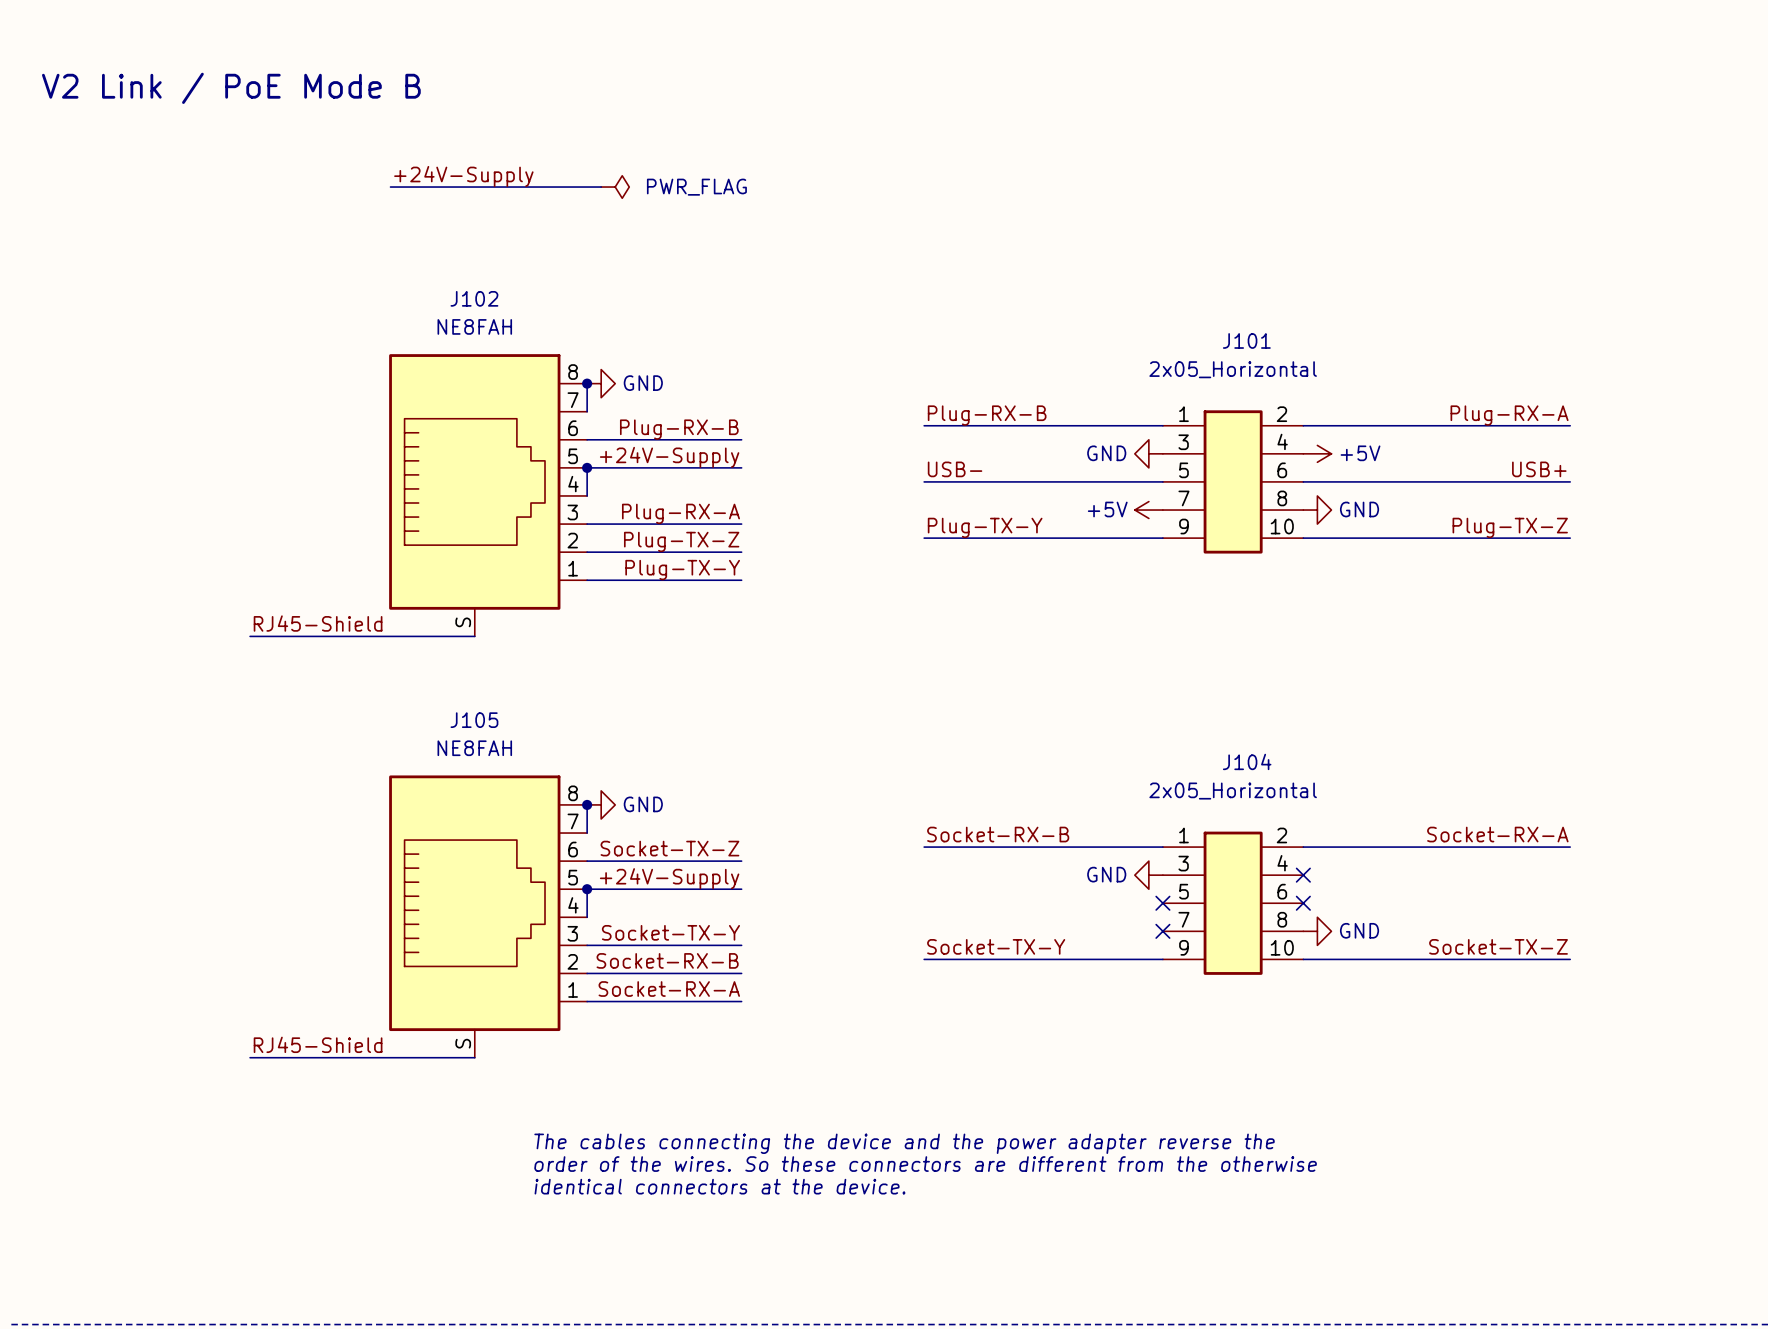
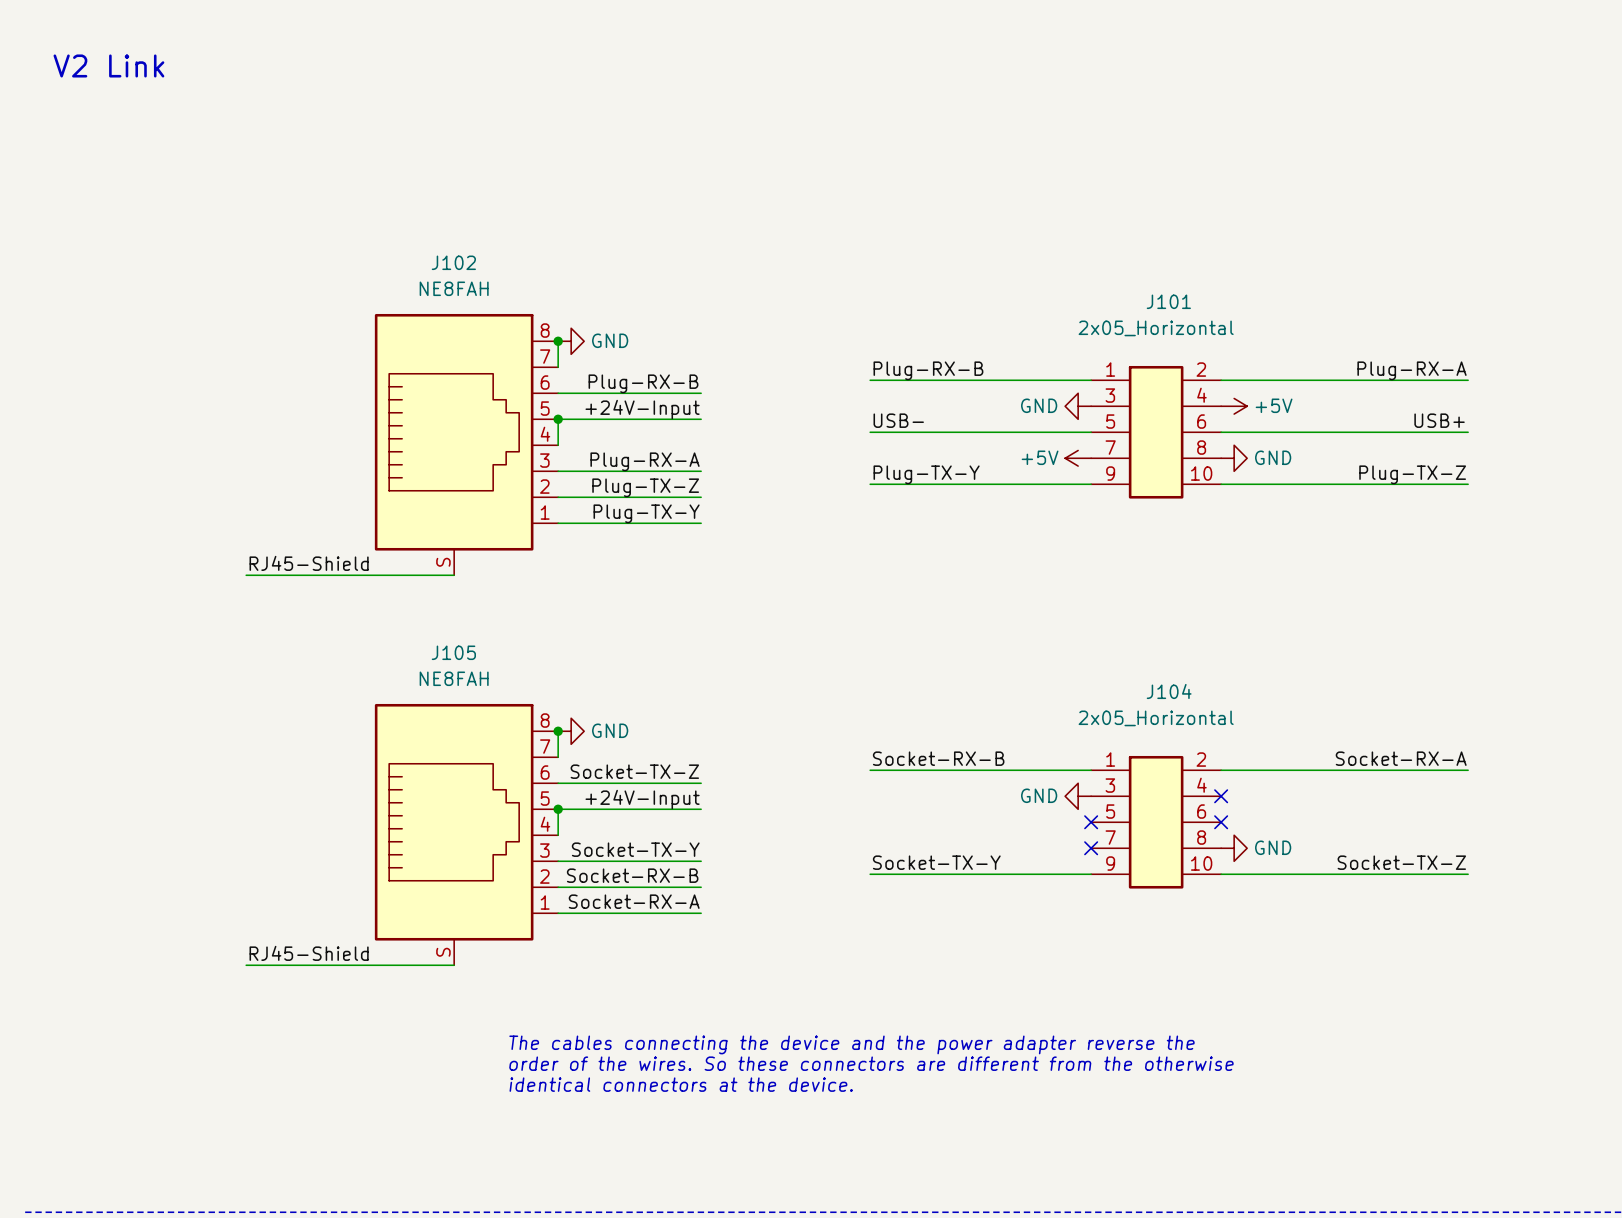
text: V2 Link / PoE Mode B (231, 88) -> V2 Link (108, 65)
label: +24V-Supply (463, 176) -> none
wire: (390, 187) (601, 187) -> none
power symbol: PWR_FLAG (615, 187) -> none
label: +24V-Supply (669, 457) -> +24V-Input (642, 409)
label: +24V-Supply (669, 878) -> +24V-Input (642, 799)

